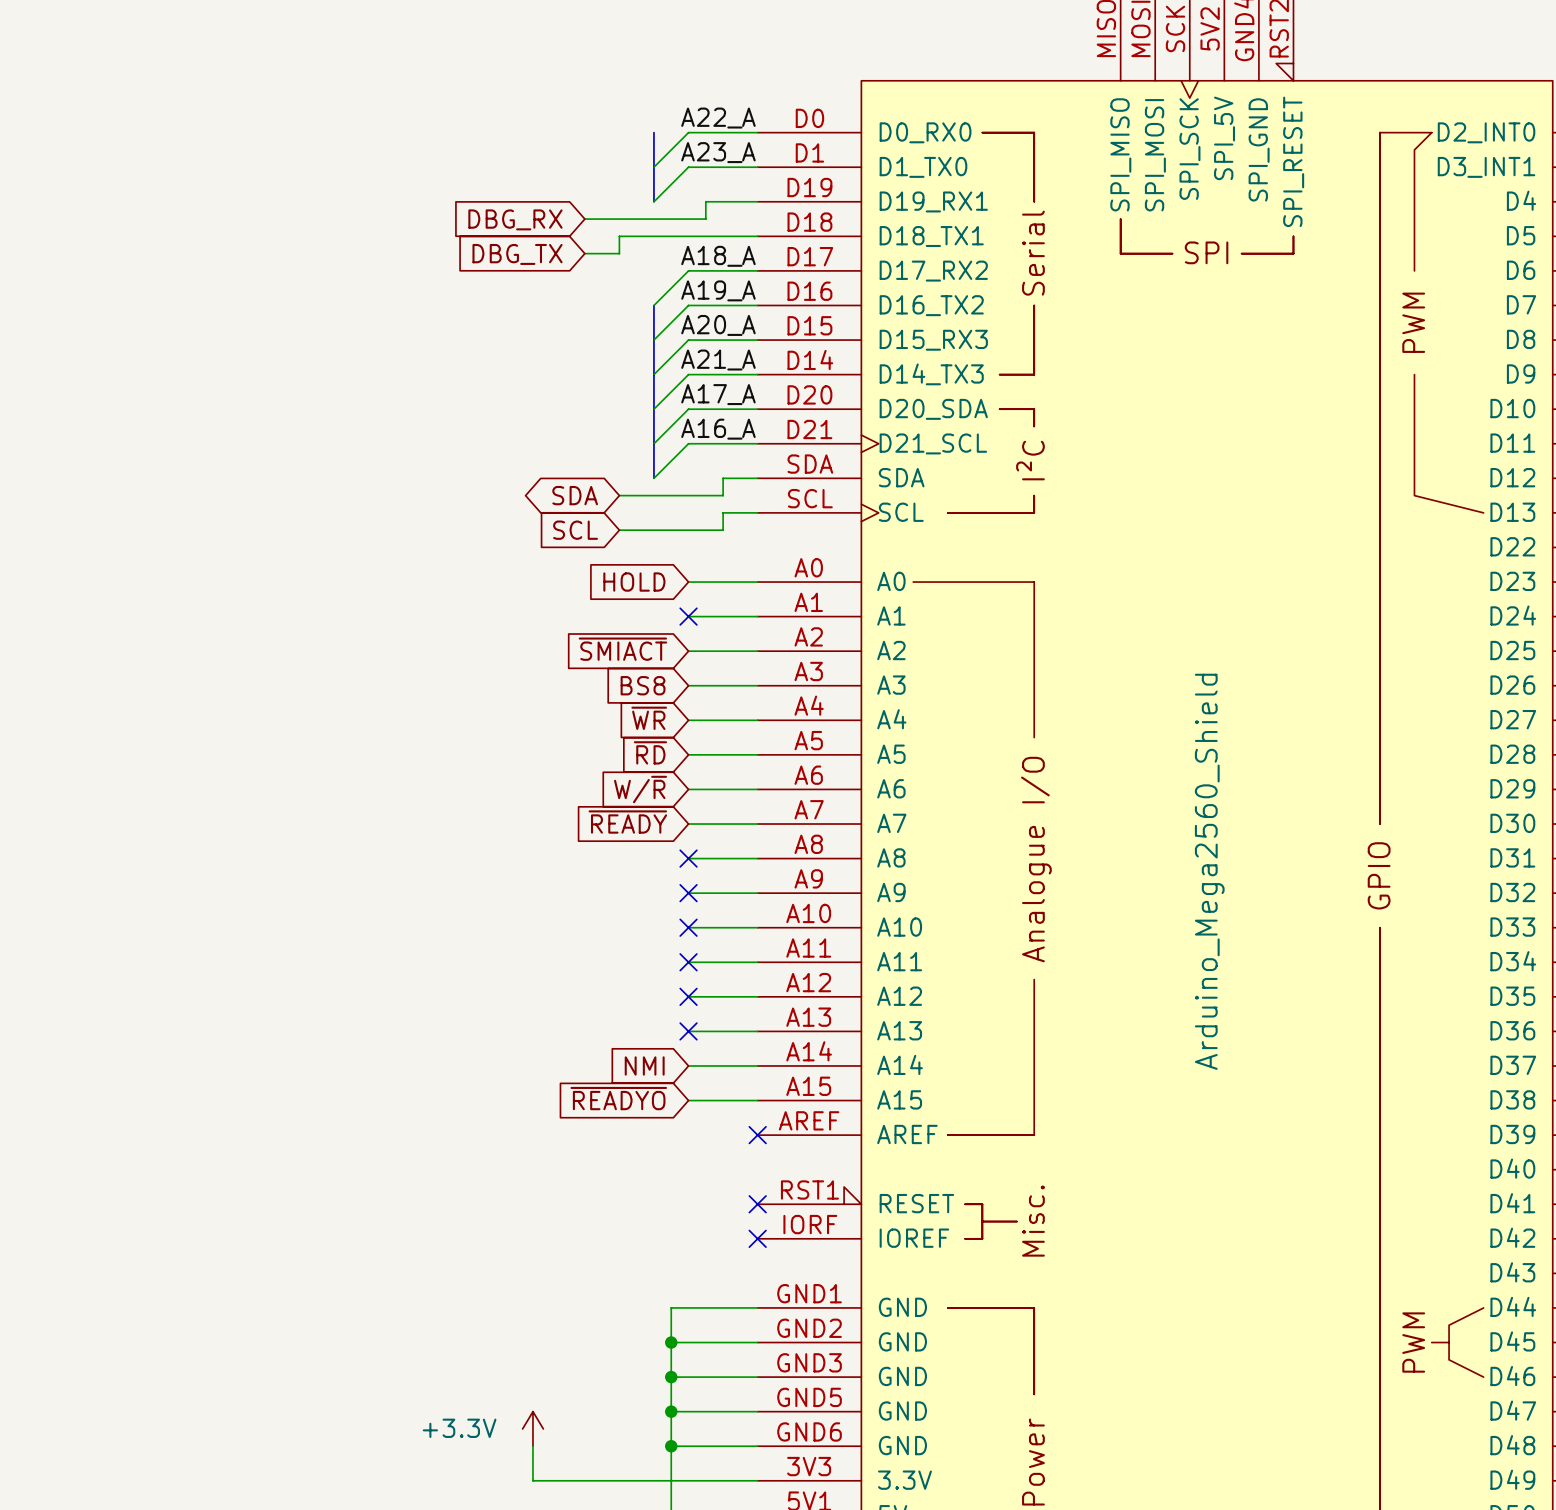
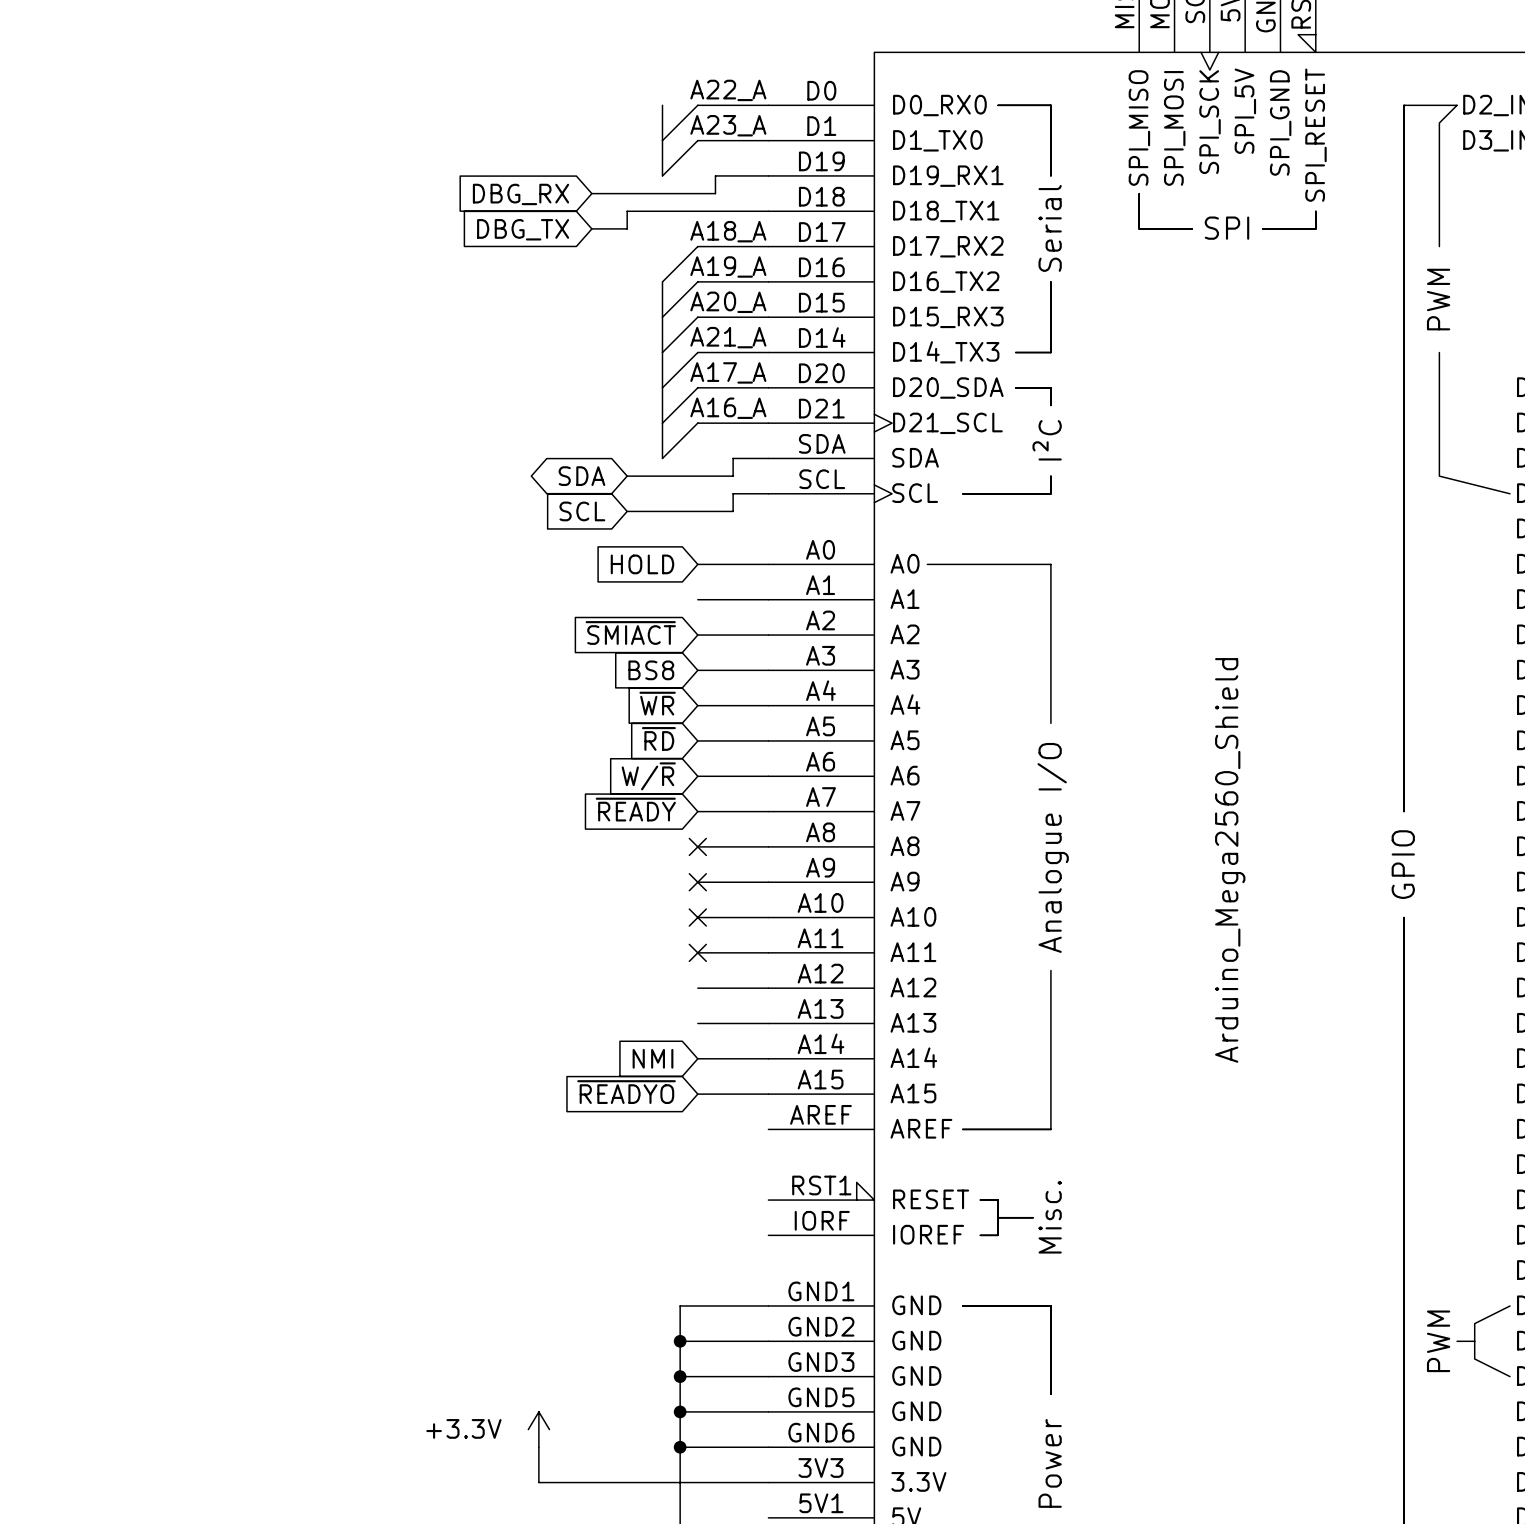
no-connect mark: (688, 616) -> none
no-connect mark: (688, 996) -> none
no-connect mark: (688, 1031) -> none
no-connect mark: (757, 1135) -> none
no-connect mark: (757, 1204) -> none
no-connect mark: (757, 1238) -> none

